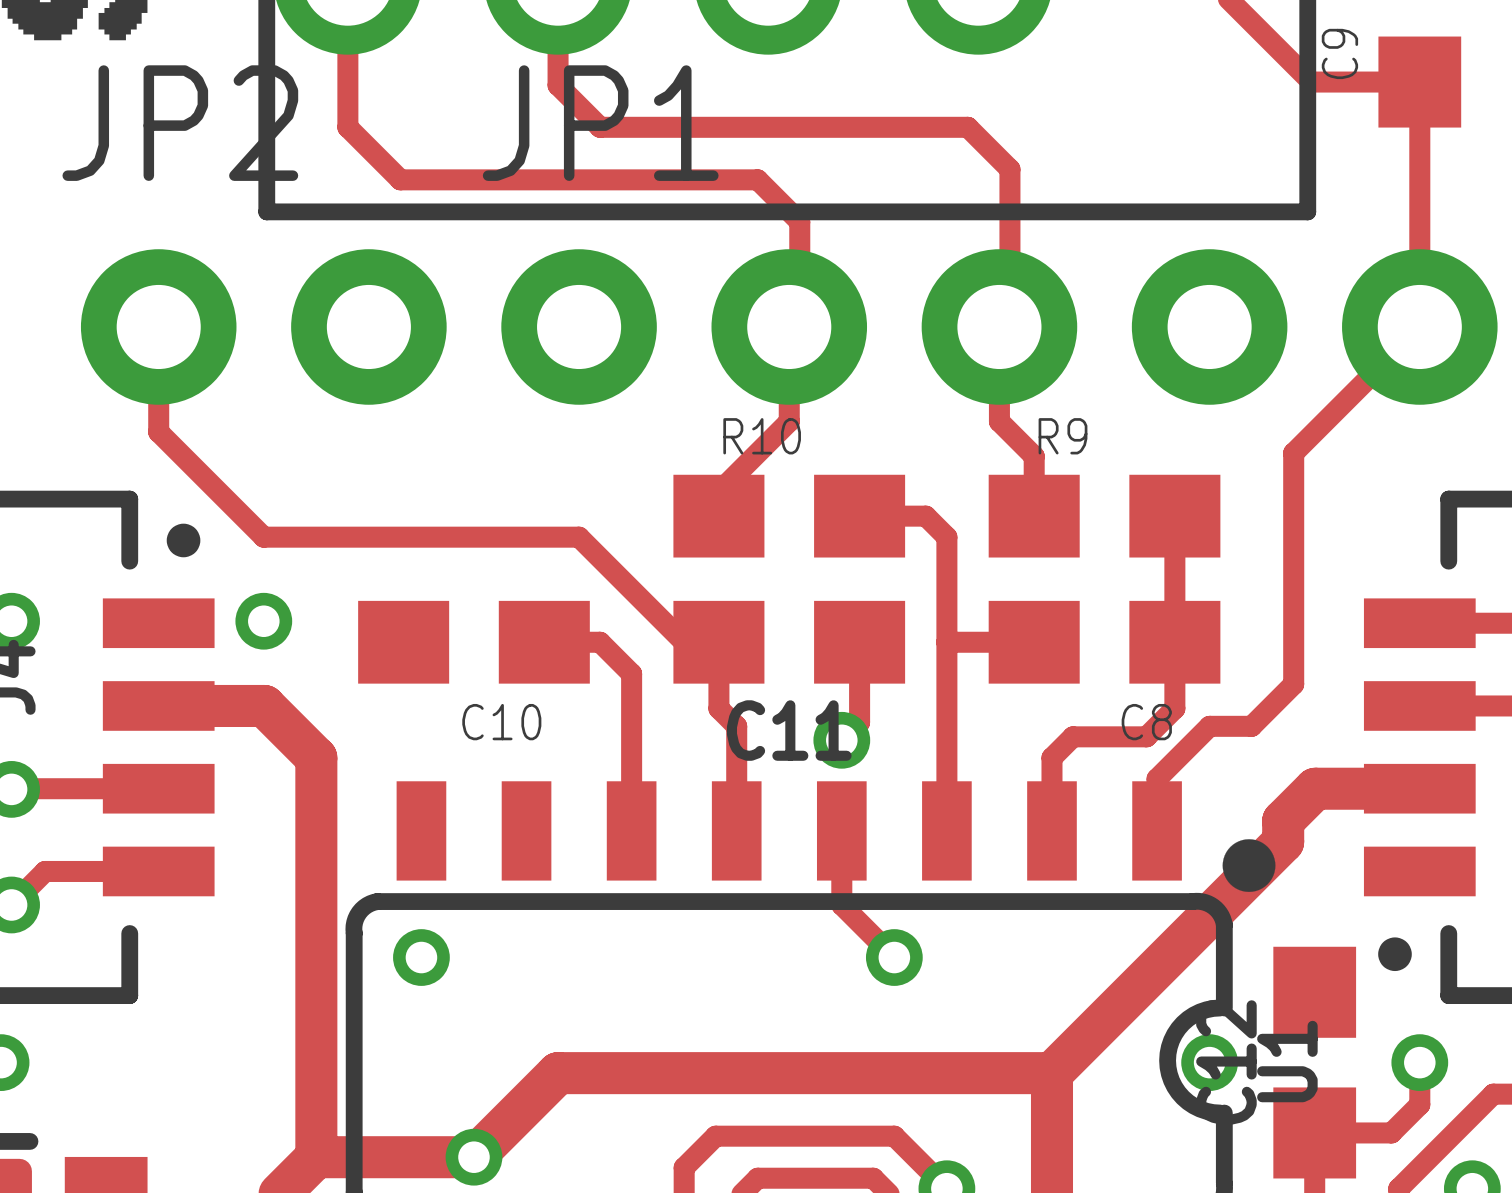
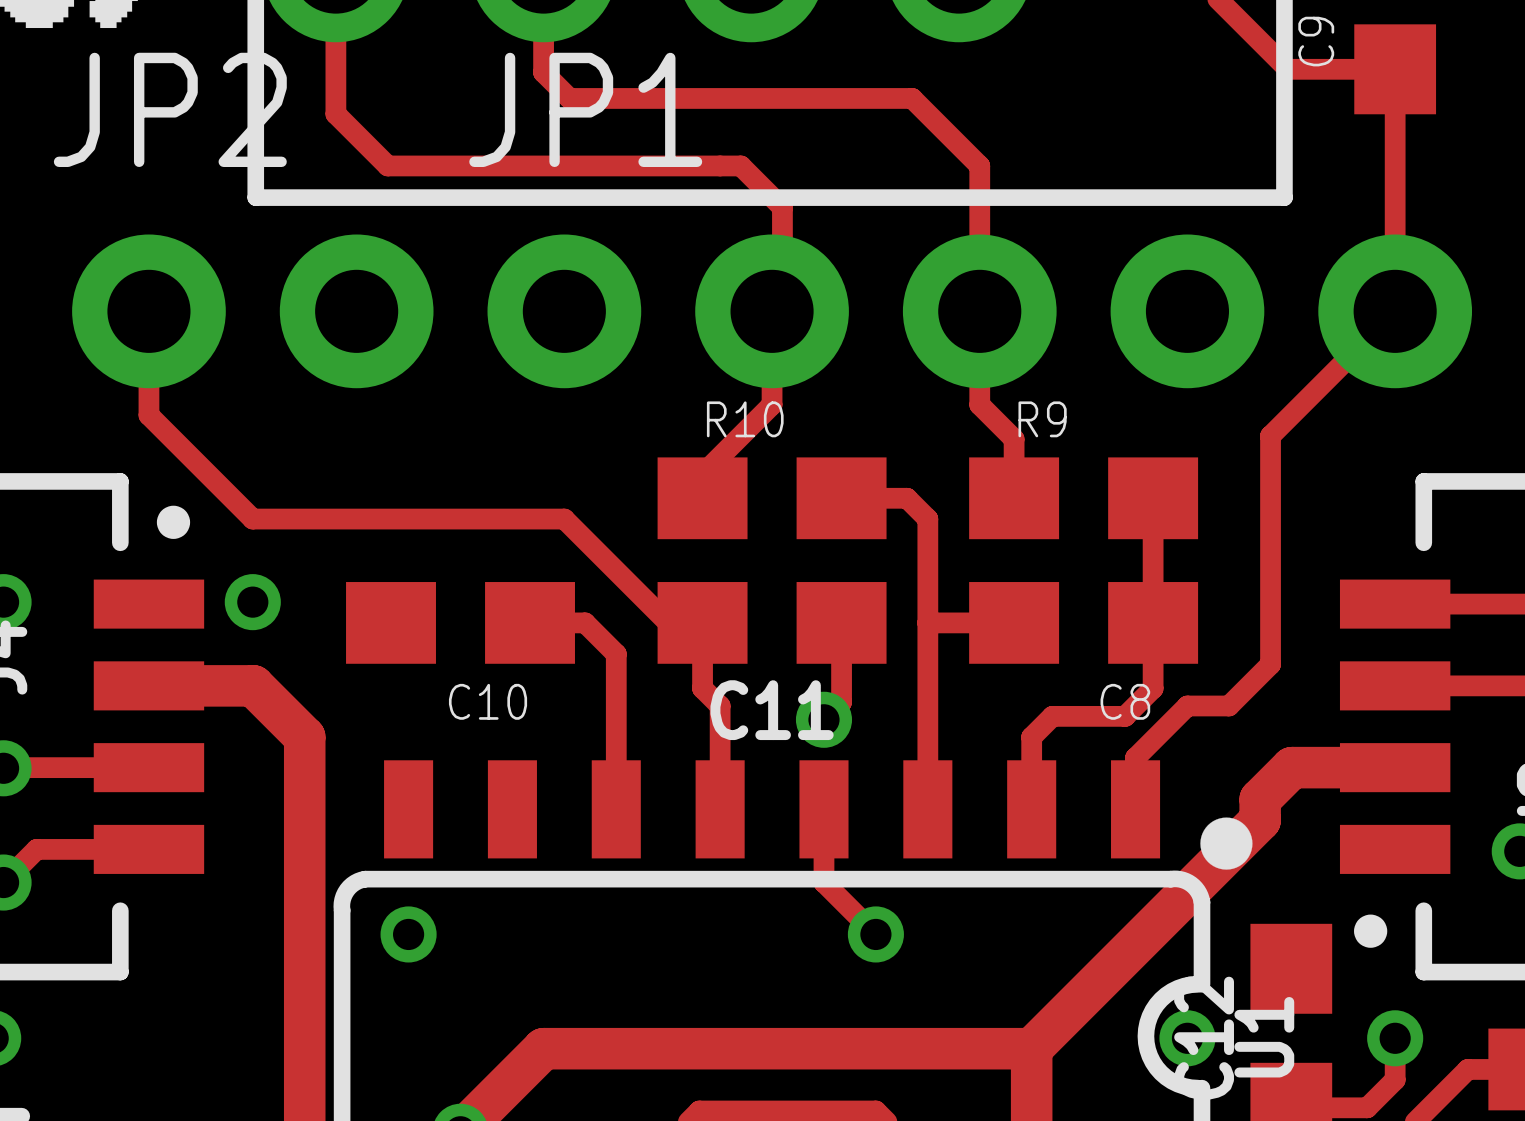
track: (584, 111) (600, 127) (967, 127) (1009, 169) (1009, 316) (999, 326) -> (569, 98) (912, 98) (979, 165) (979, 311)

